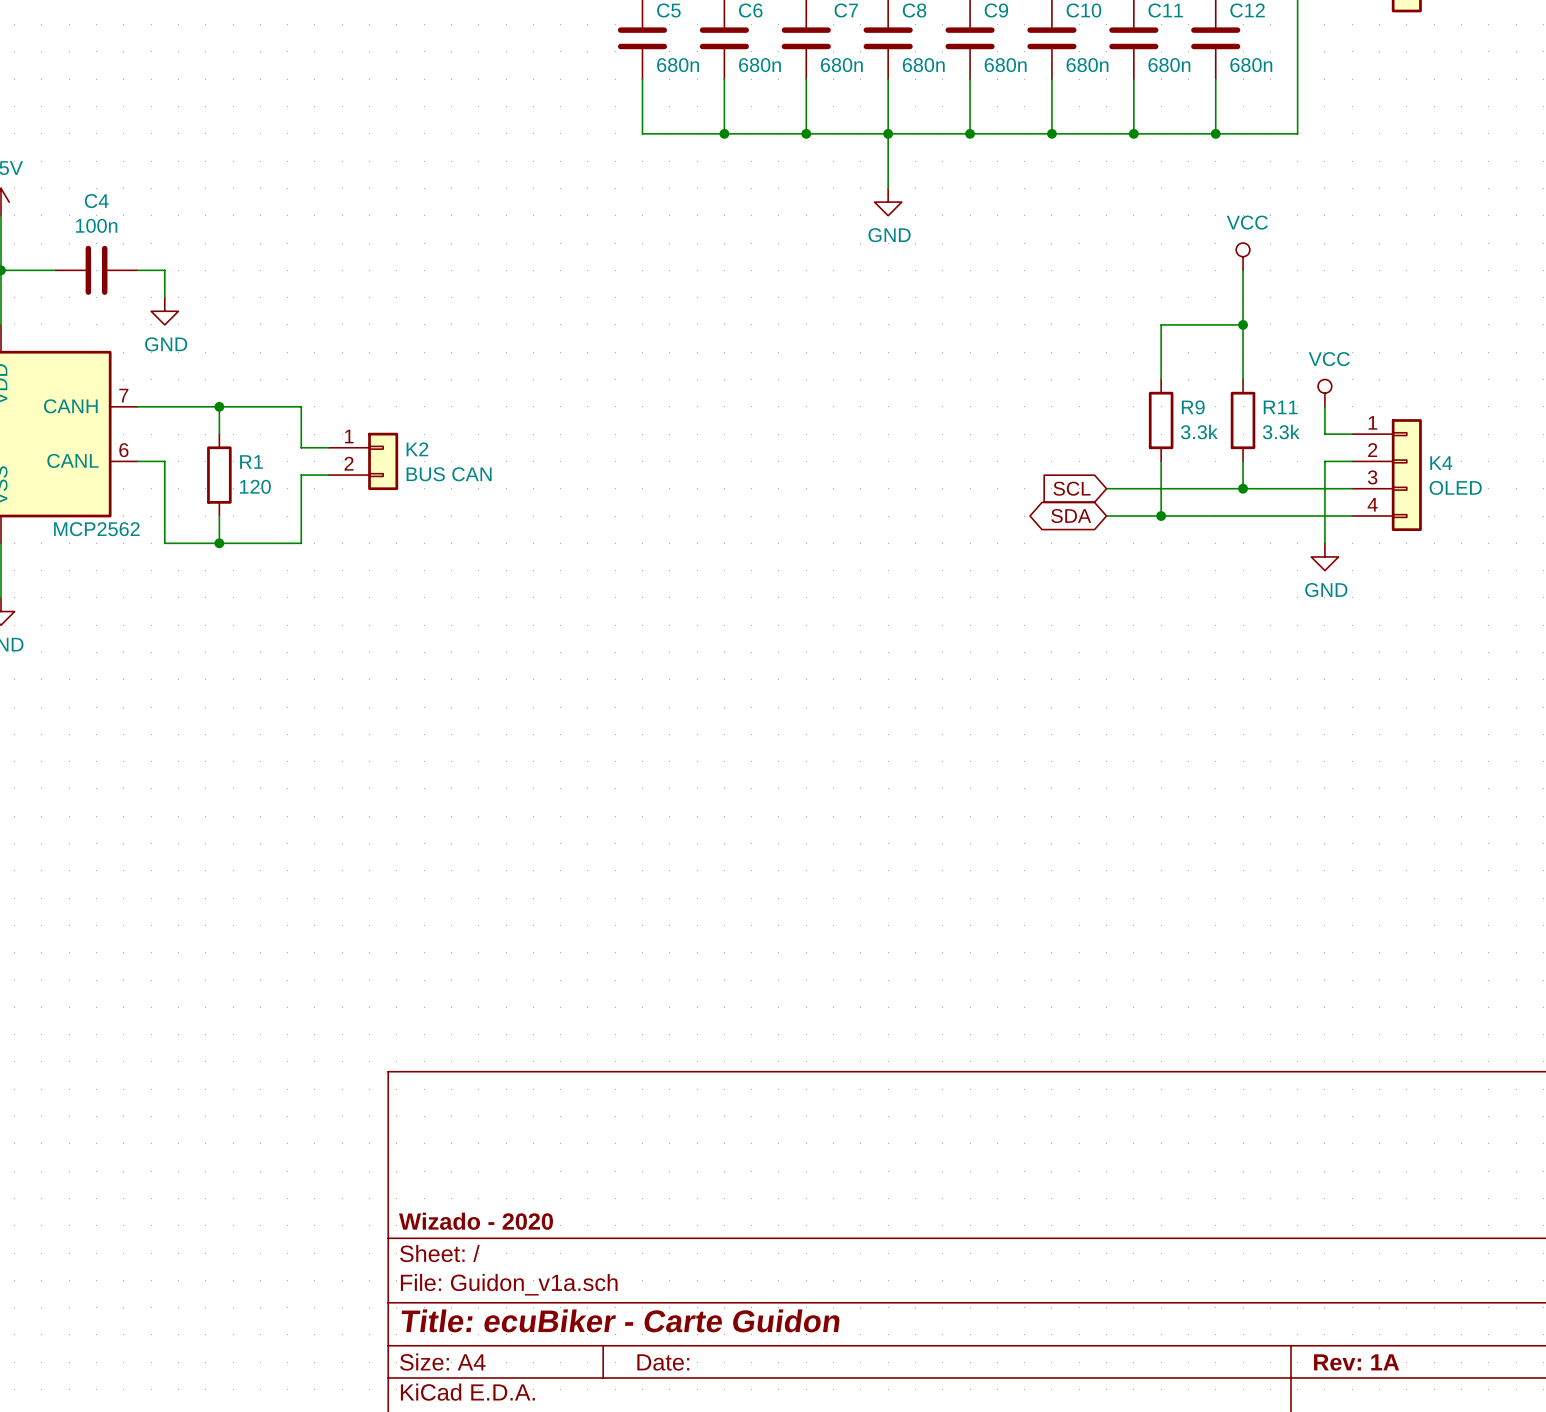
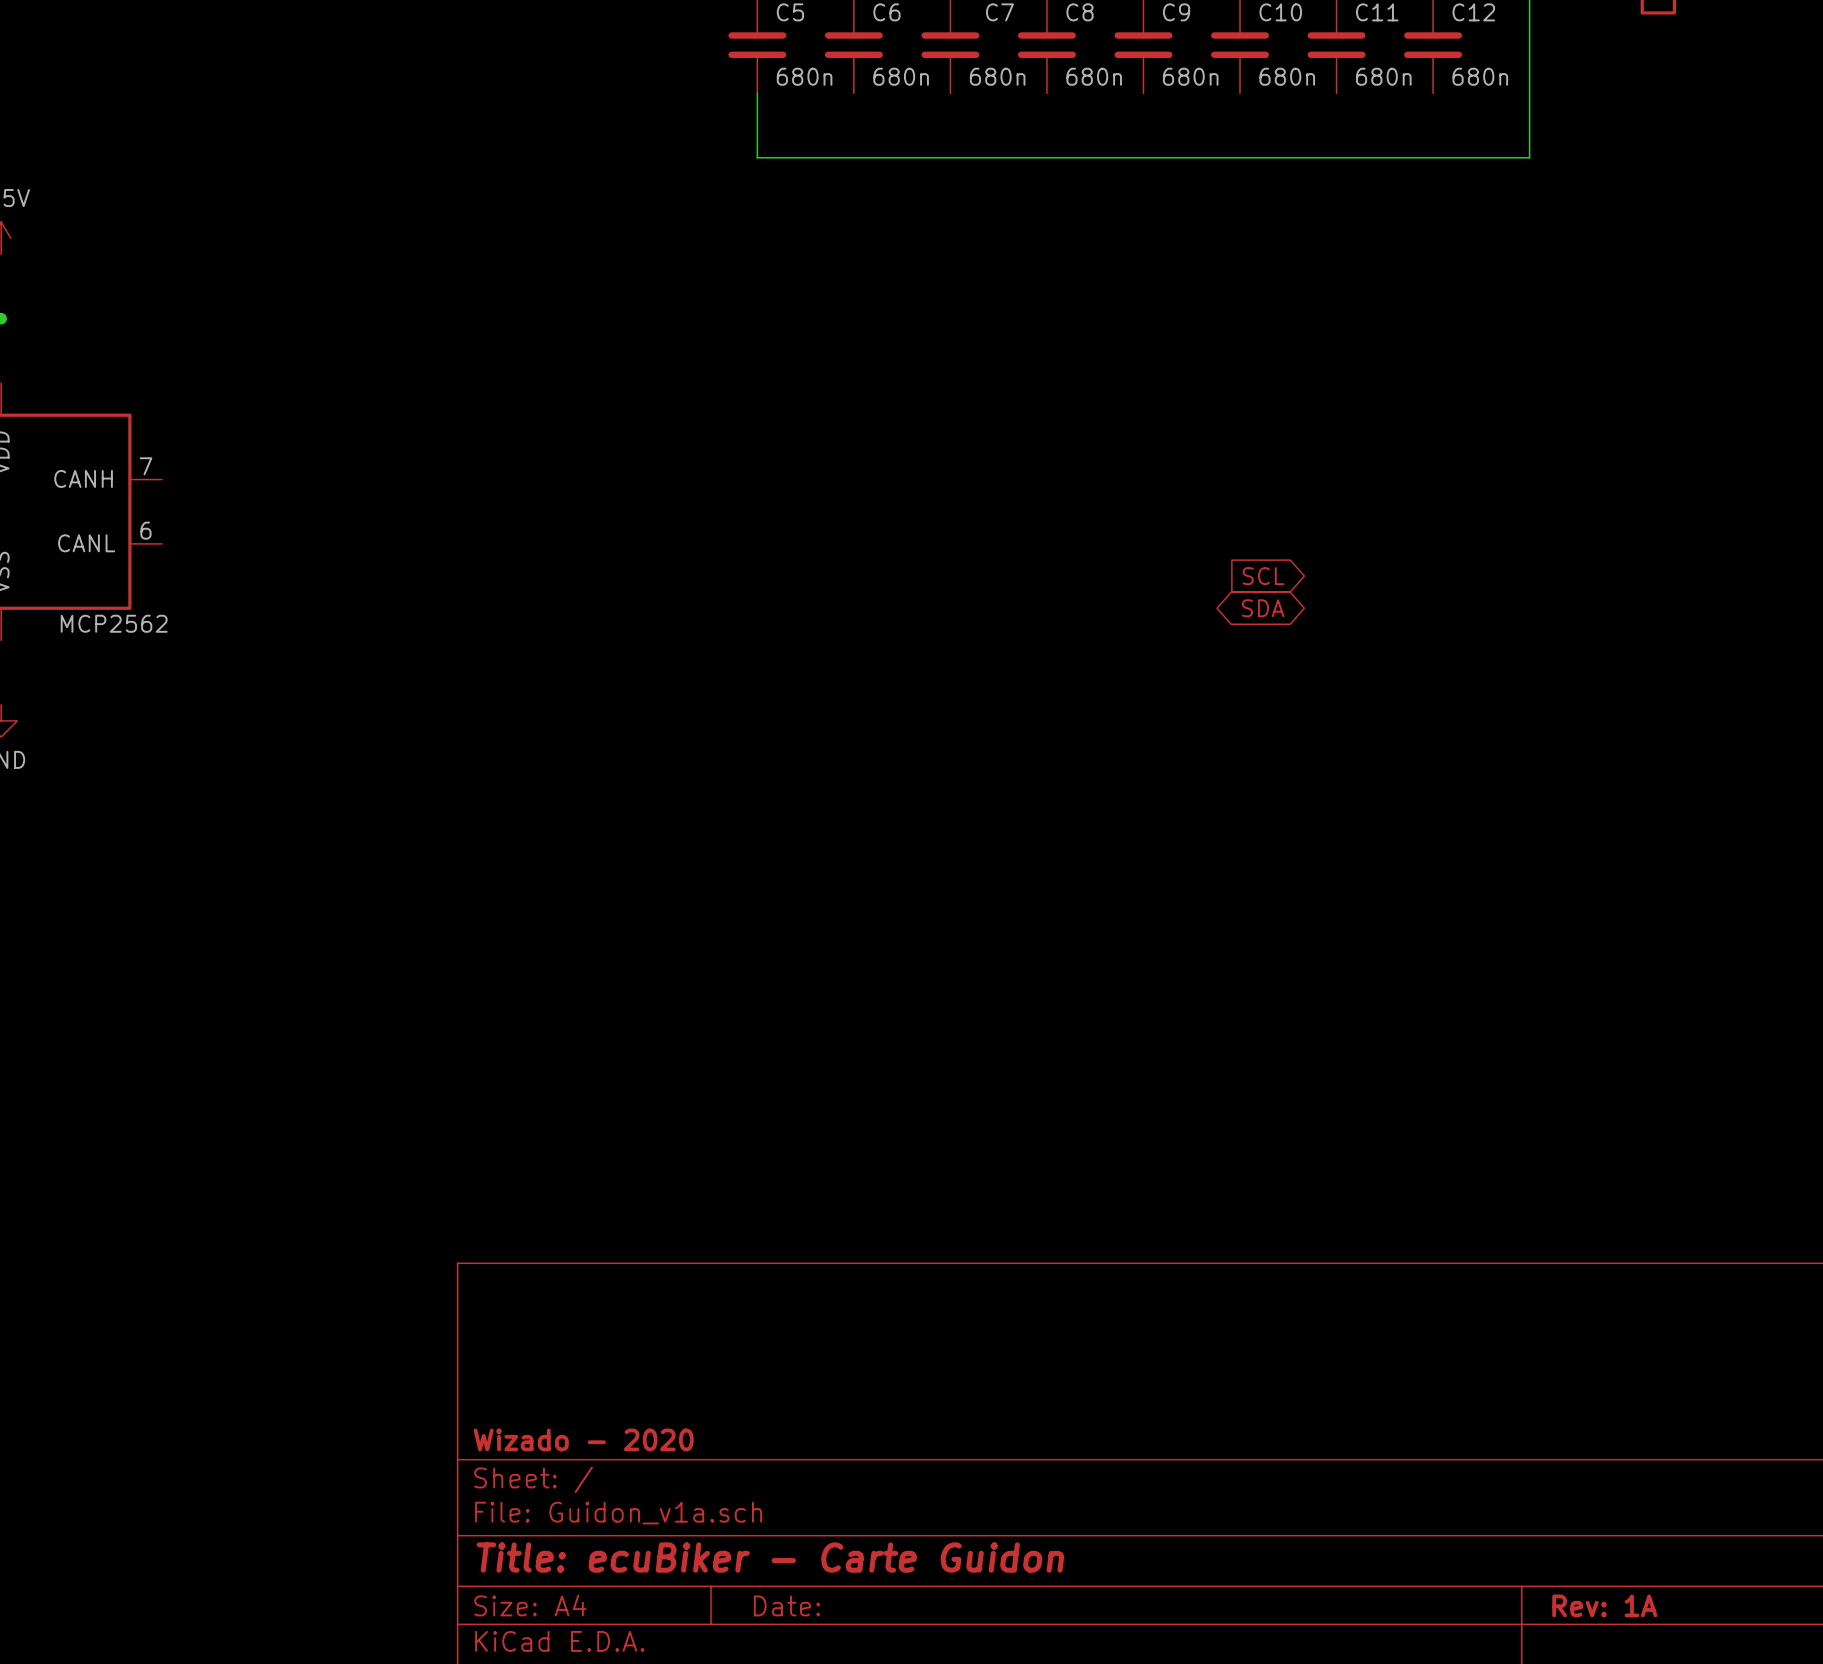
wire: (724, 79) (724, 133) -> none
wire: (806, 79) (806, 133) -> none
wire: (888, 79) (888, 188) -> none
wire: (970, 79) (970, 133) -> none
wire: (1051, 79) (1051, 133) -> none
wire: (1133, 79) (1133, 133) -> none
wire: (1215, 79) (1215, 133) -> none
junction: (724, 133) -> none
junction: (806, 133) -> none
junction: (888, 133) -> none
junction: (970, 133) -> none
junction: (1051, 133) -> none
junction: (1133, 133) -> none
junction: (1215, 133) -> none
power symbol: GND (888, 202) -> none
wire: (0, 215) (0, 324) -> none
power symbol: VCC (1243, 256) -> none
wire: (0, 270) (55, 270) -> none
C4: 100n (96, 270) -> none
wire: (137, 270) (164, 270) (164, 297) -> none
wire: (1243, 270) (1243, 379) -> none
power symbol: GND (164, 311) -> none
wire: (1243, 324) (1161, 324) (1161, 379) -> none
junction: (1243, 324) -> none
power symbol: VCC (1324, 393) -> none
wire: (137, 406) (301, 406) (301, 447) (328, 447) -> none
wire: (219, 406) (219, 434) -> none
junction: (219, 406) -> none
wire: (1324, 406) (1324, 434) (1352, 434) -> none
R9: 3.3k (1161, 420) -> none
R11: 3.3k (1243, 420) -> none
wire: (137, 461) (164, 461) (164, 543) (301, 543) (301, 475) (328, 475) -> none
K2: BUS CAN (363, 461) -> none
wire: (1161, 461) (1161, 516) -> none
wire: (1243, 461) (1243, 488) -> none
wire: (1352, 461) (1324, 461) (1324, 543) -> none
R1: 120 (219, 475) -> none
K4: OLED (1387, 475) -> none
wire: (1106, 488) (1352, 488) -> none
junction: (1243, 488) -> none
wire: (219, 516) (219, 543) -> none
wire: (1106, 516) (1352, 516) -> none
junction: (1161, 516) -> none
wire: (0, 543) (0, 597) -> none
junction: (219, 543) -> none
power symbol: GND (1324, 556) -> none

